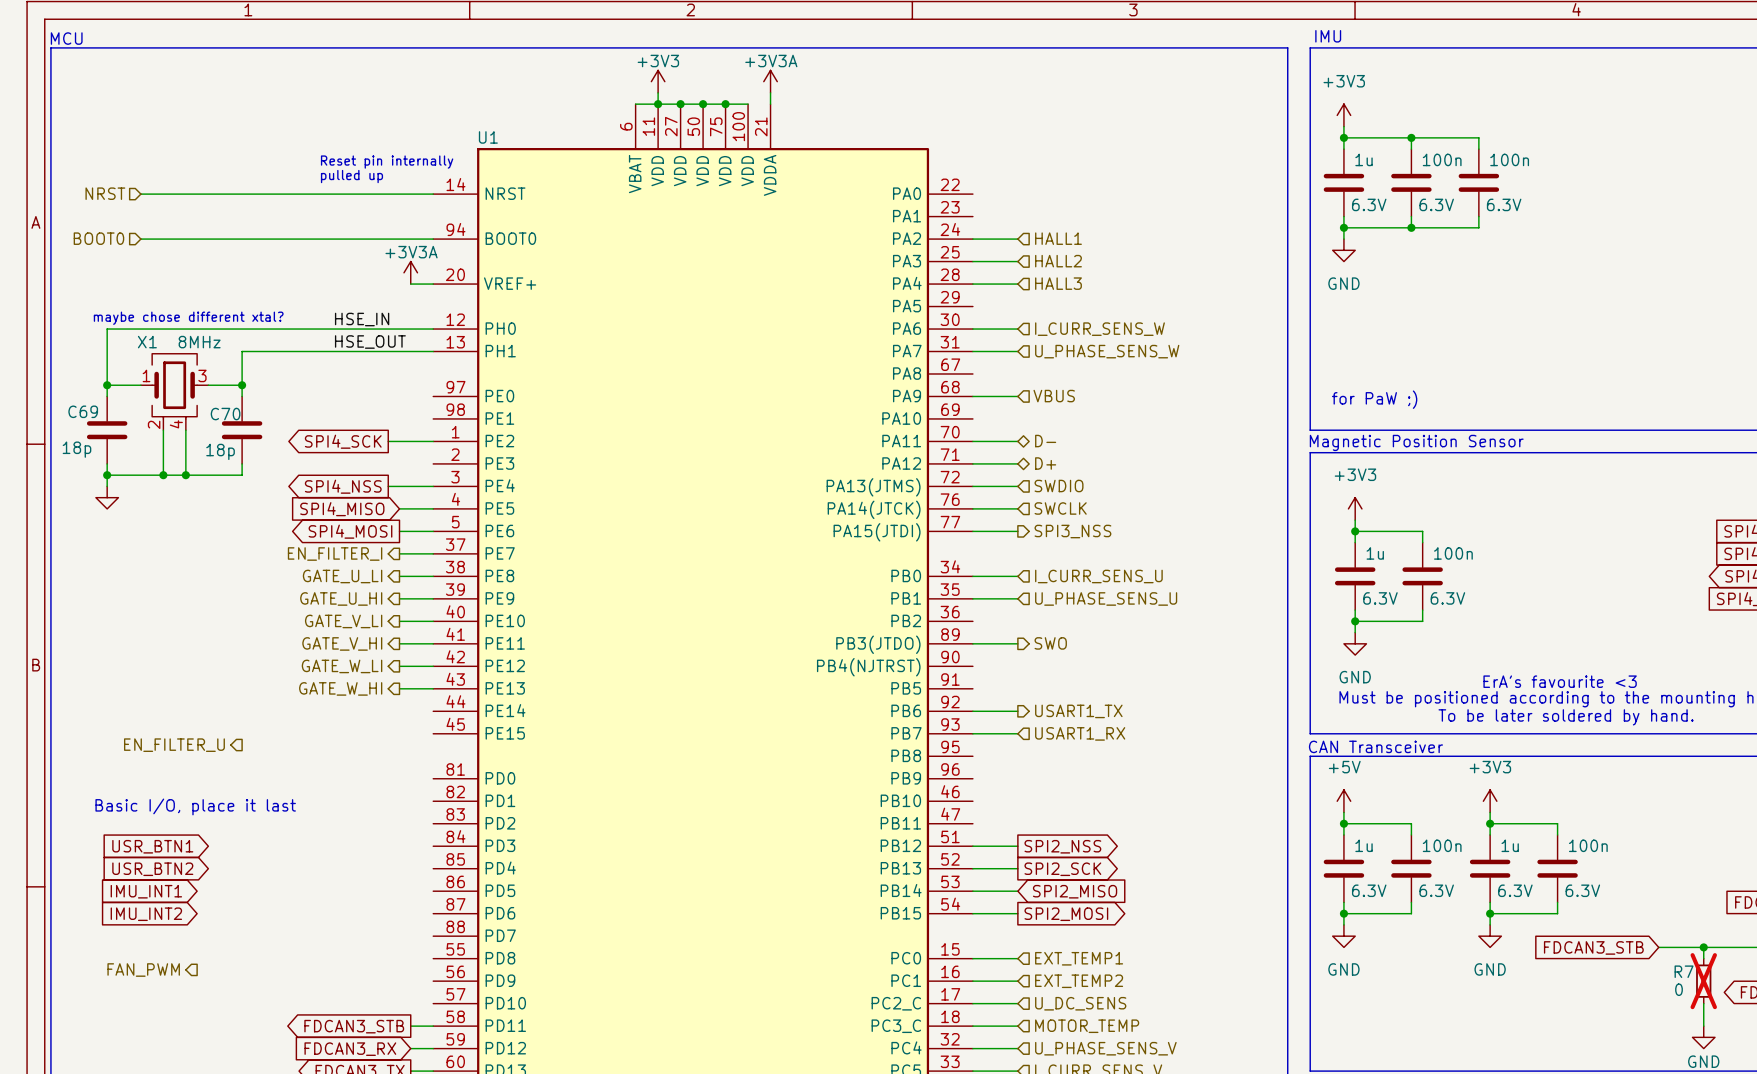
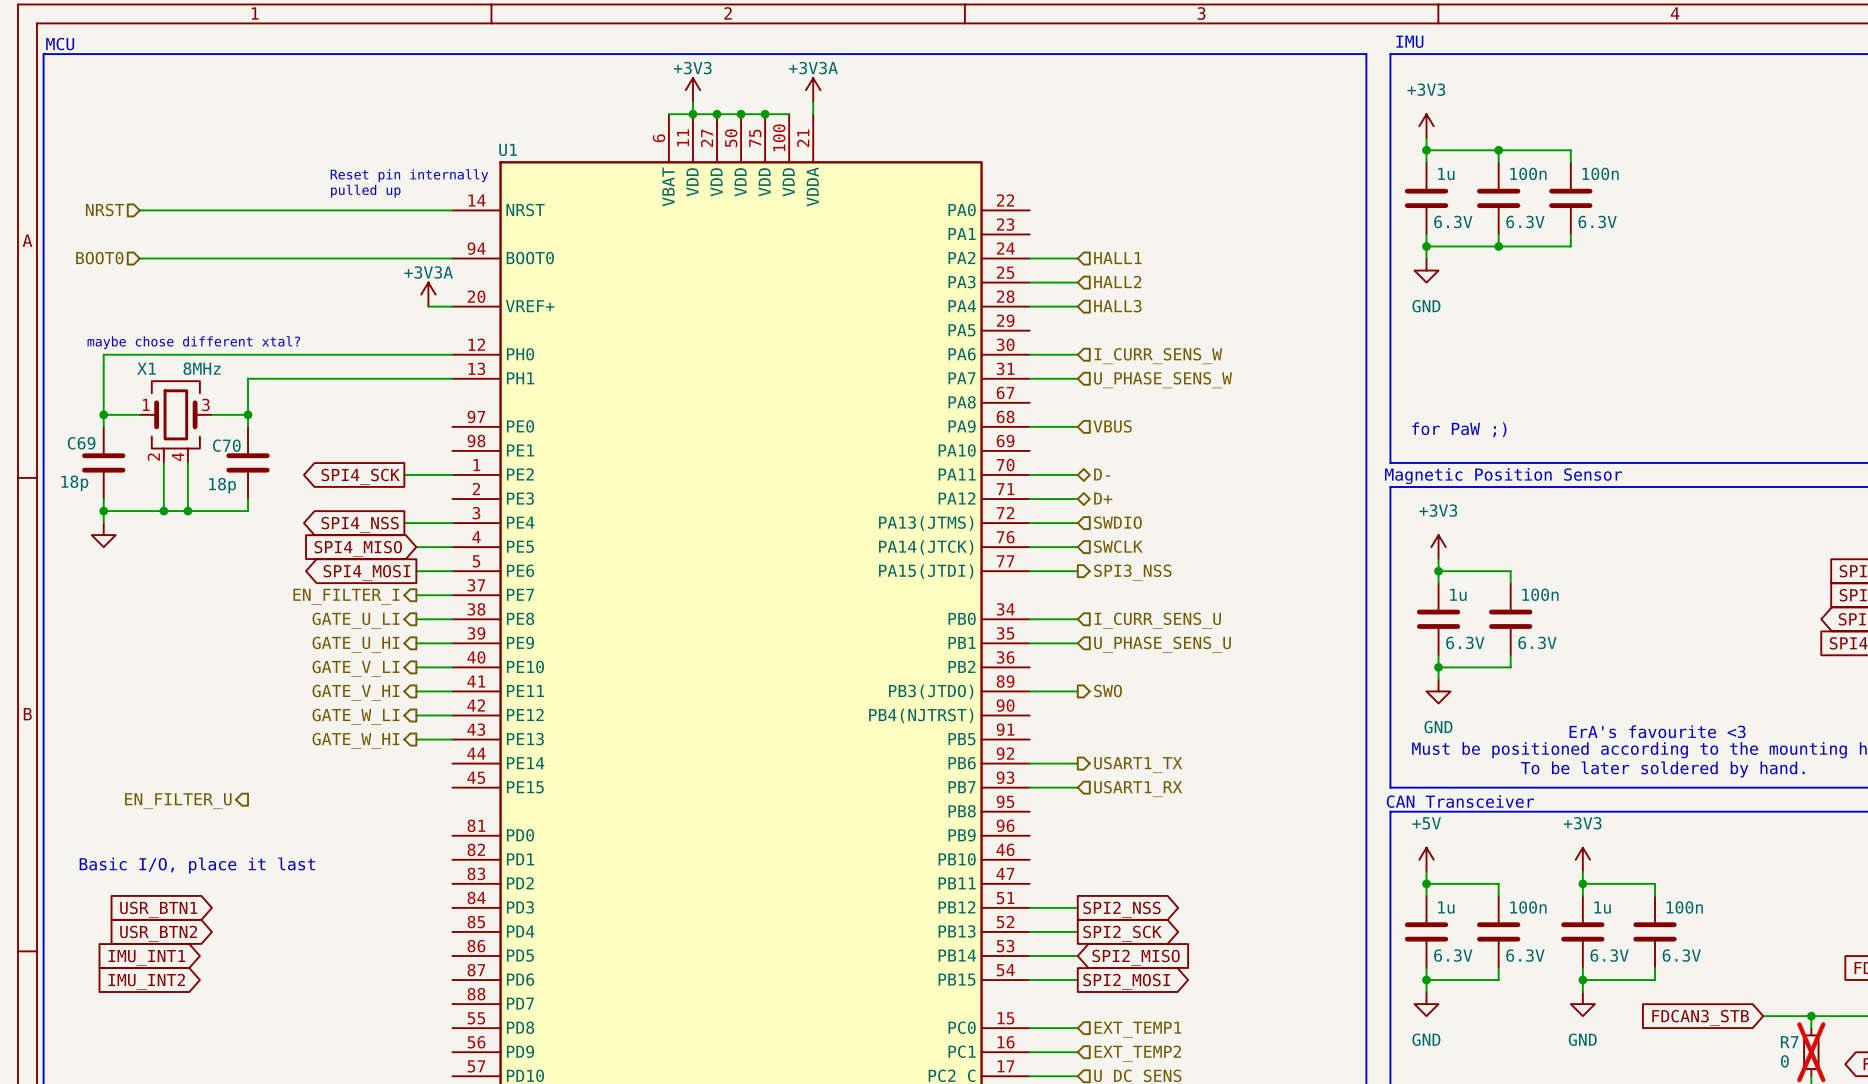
label: HSE_IN (362, 319) -> none
label: HSE_OUT (370, 342) -> none
hierarchical label: FAN_PWM (143, 970) -> none

